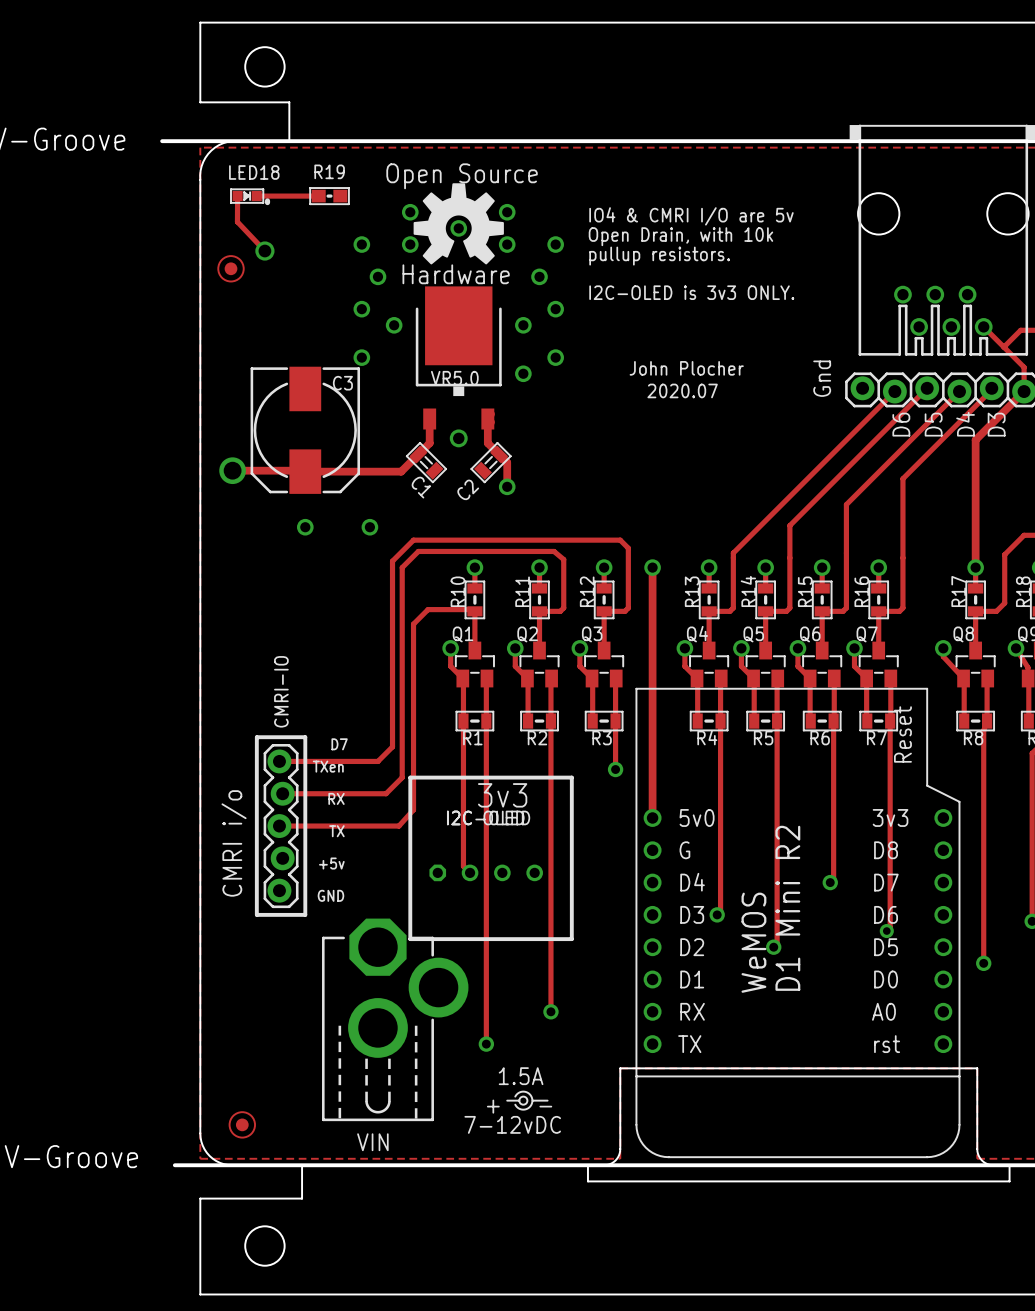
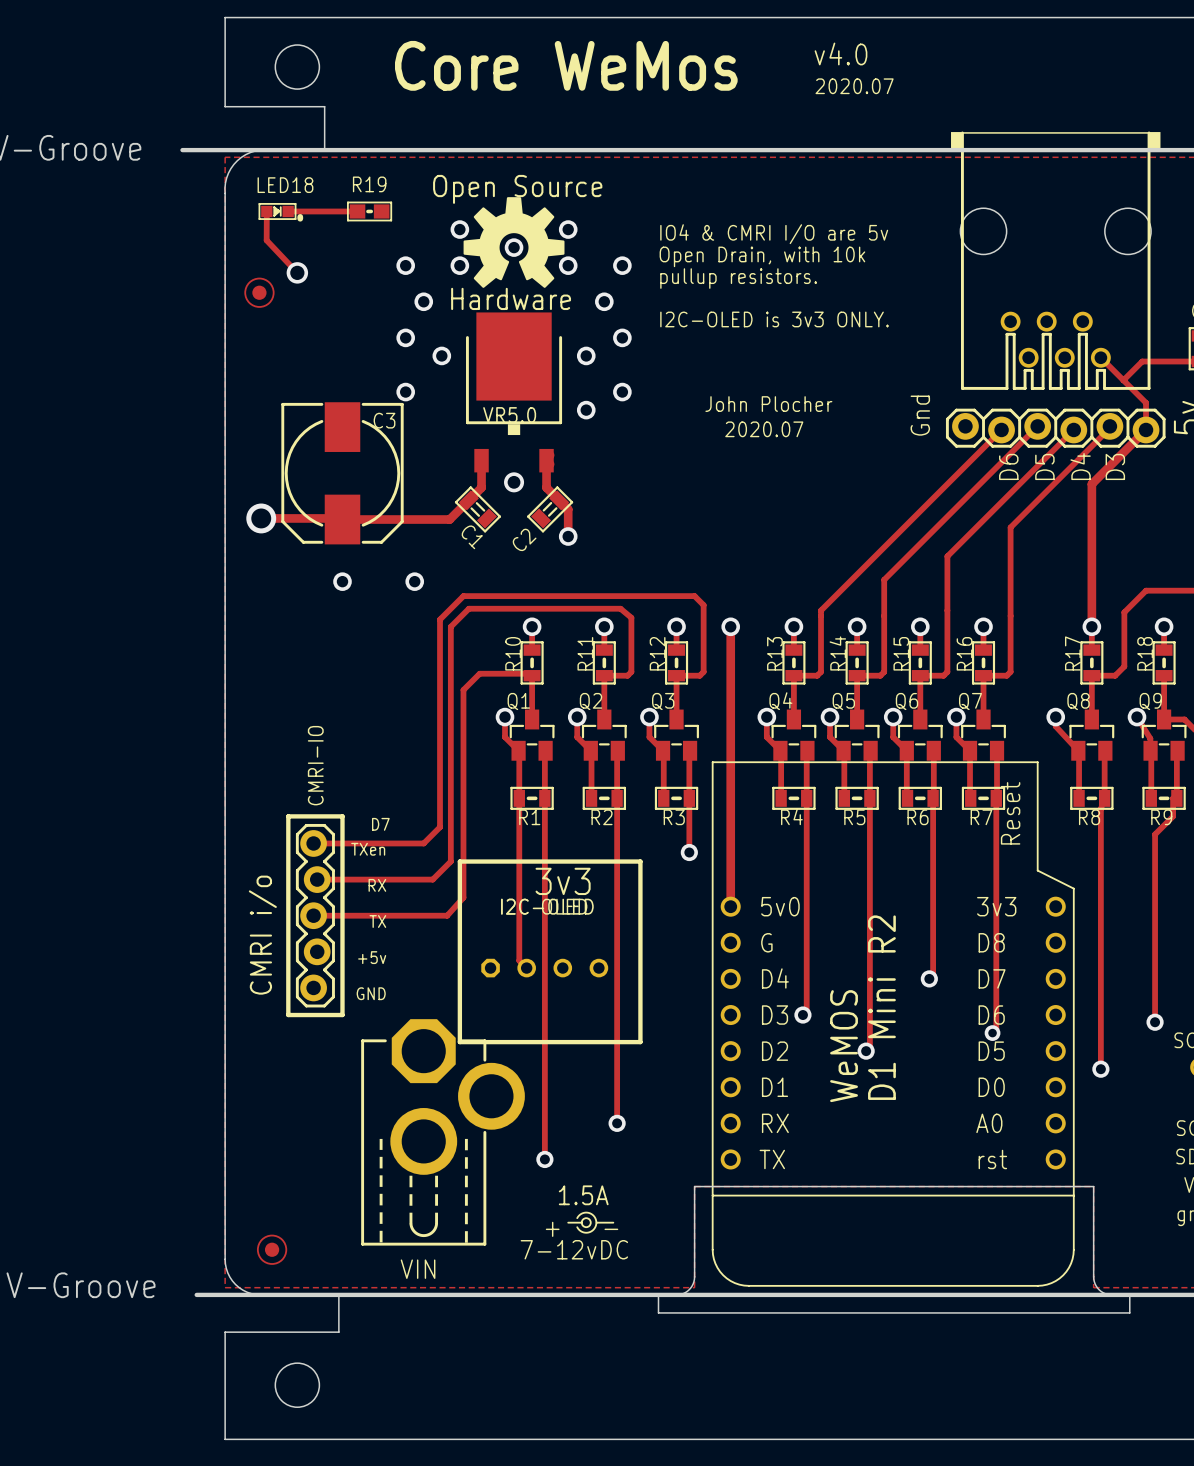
text: none -> v4.0 (841, 53)
text: none -> Core WeMos (566, 65)
text: none -> 2020.07 (854, 86)

